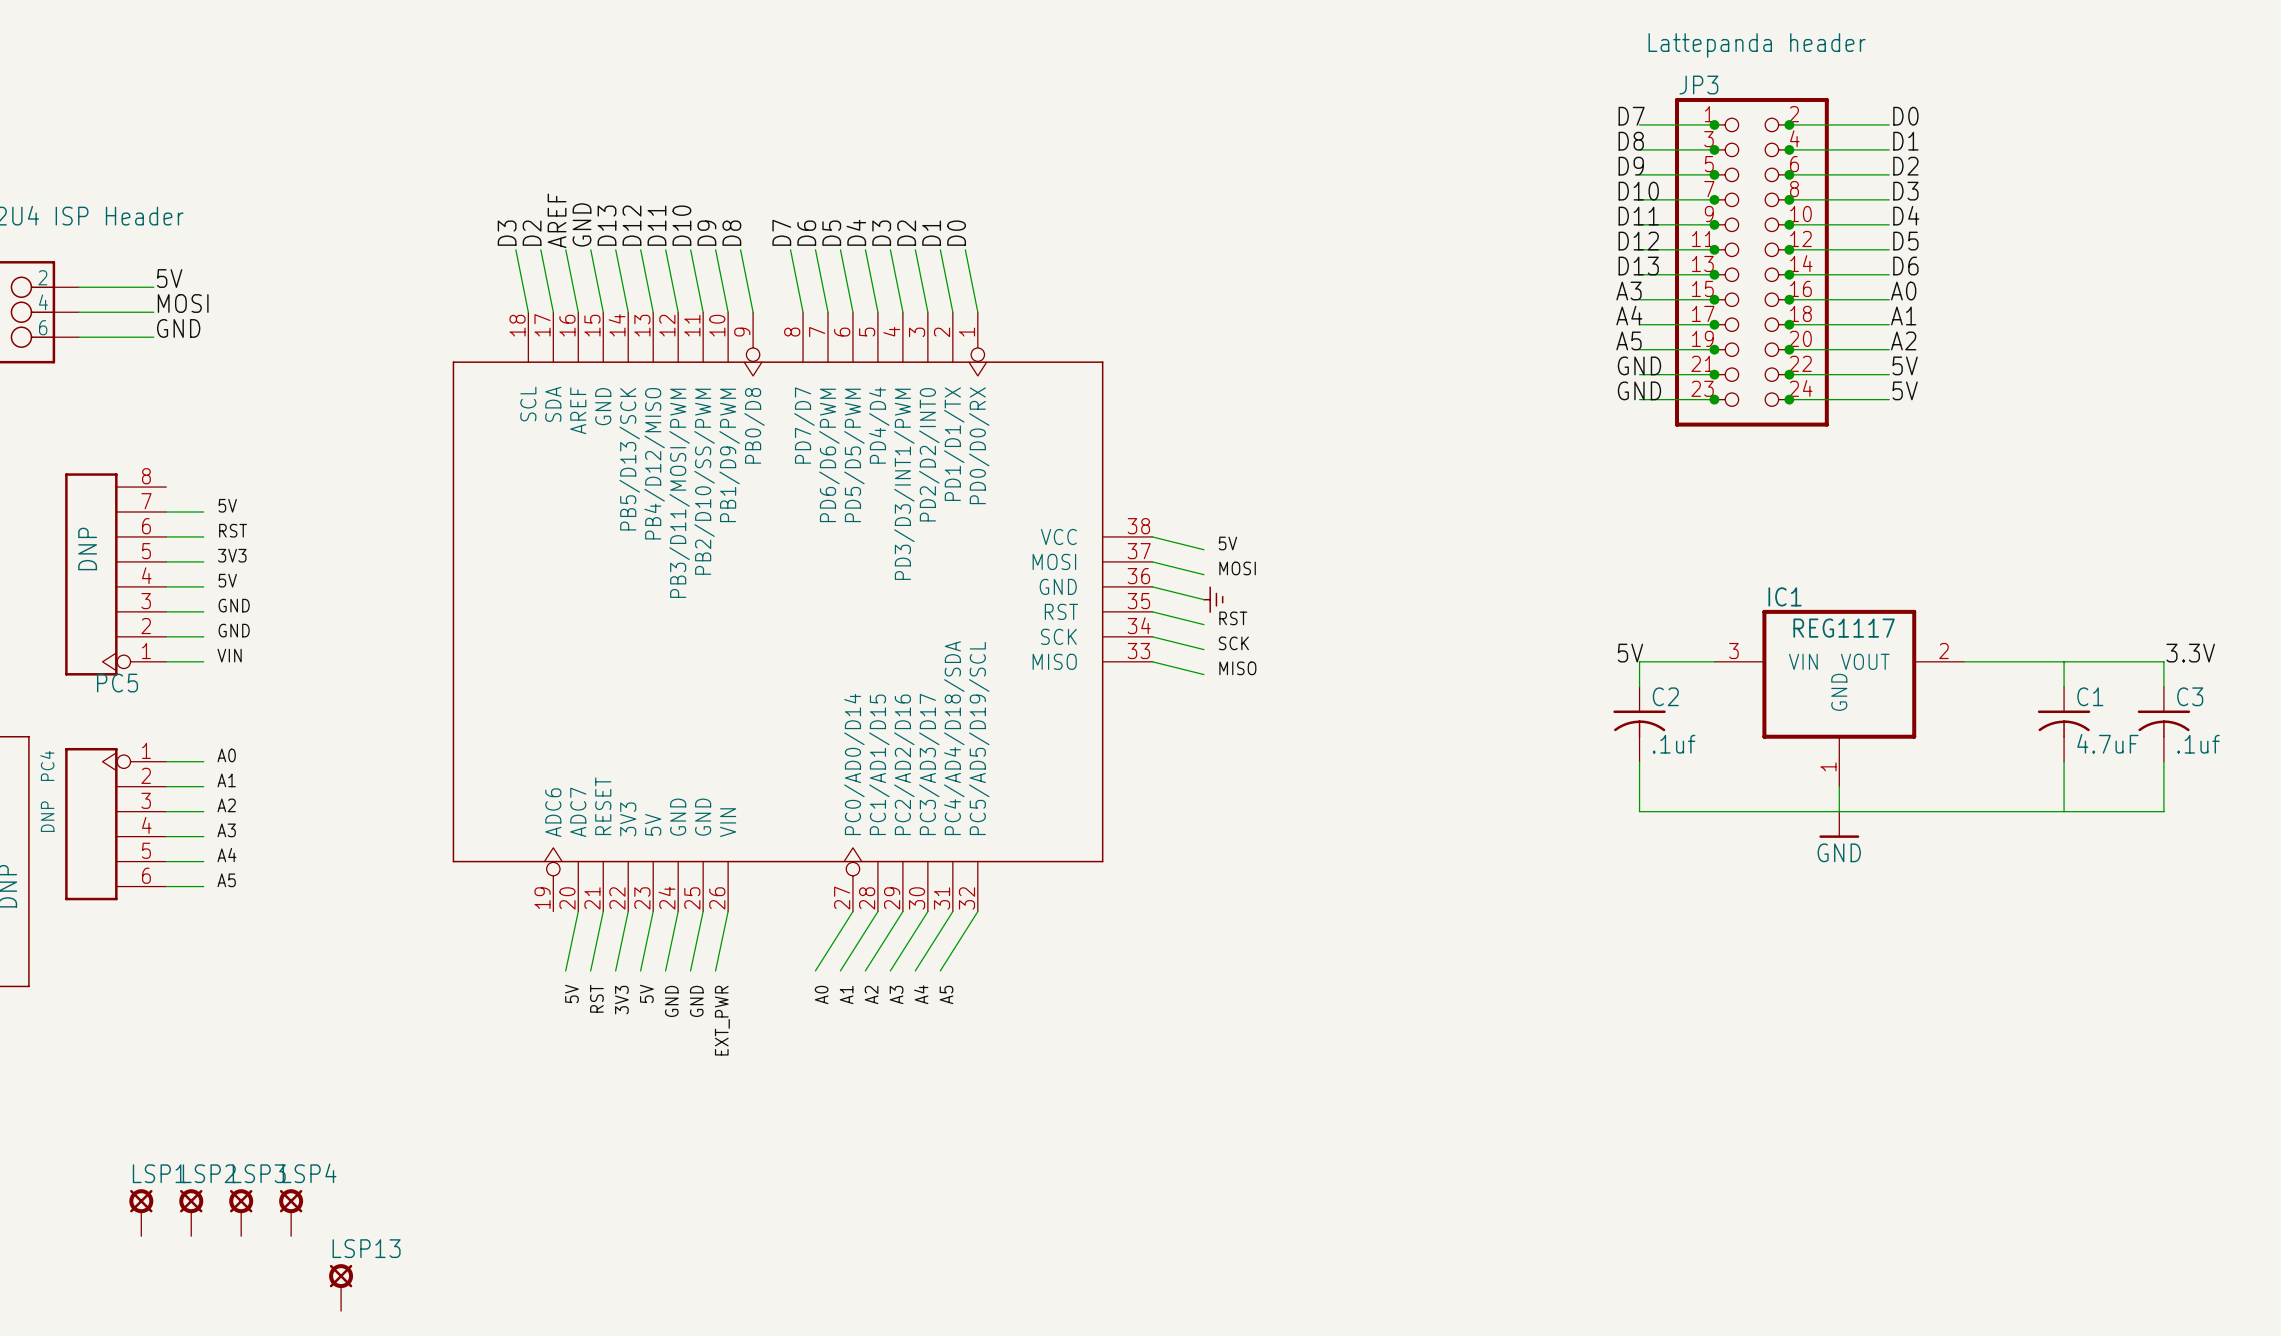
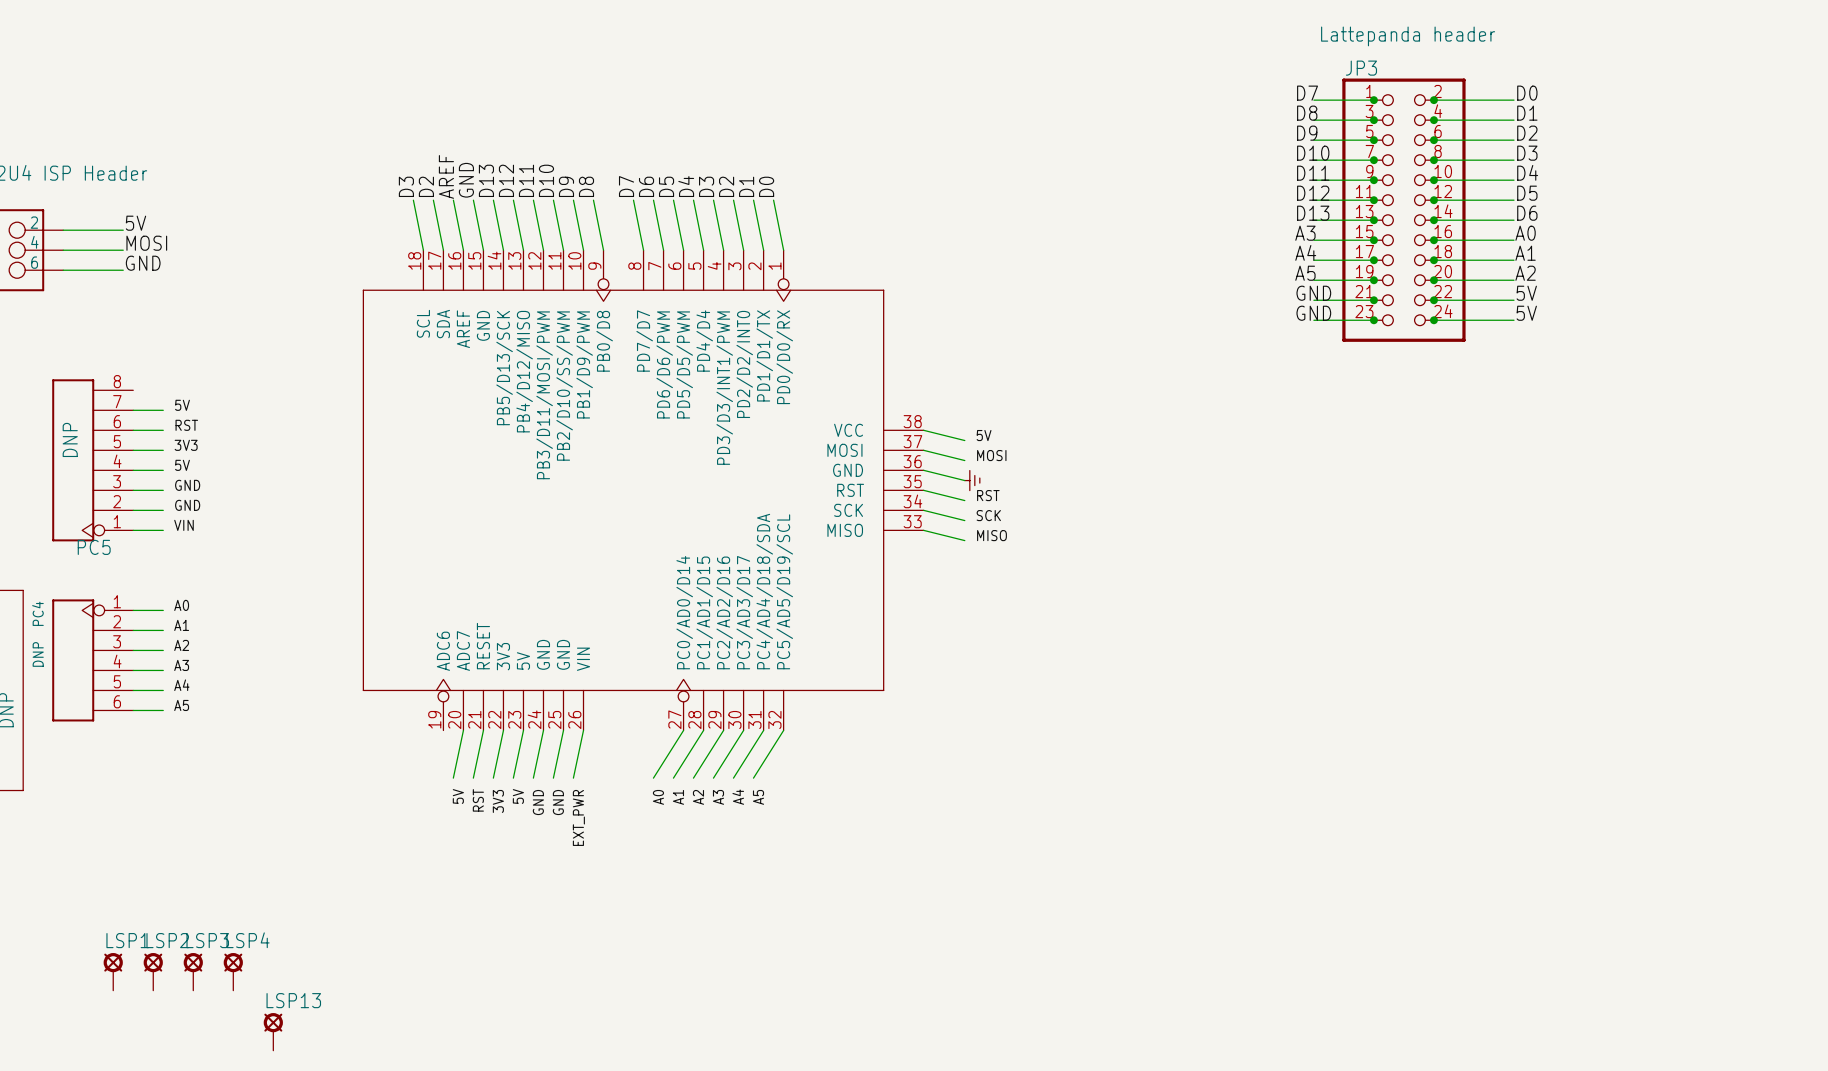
label: 5V (1630, 653) -> none
label: 3.3V (2190, 653) -> none
wire: (1714, 661) (1639, 661) (1639, 686) -> none
wire: (1964, 661) (2163, 661) (2163, 686) -> none
wire: (2064, 661) (2064, 686) -> none
IC1: REG1117 (1839, 698) -> none
C2: .1uf (1639, 724) -> none
C1: 4.7uF (2064, 724) -> none
C3: .1uf (2163, 724) -> none
wire: (1639, 761) (1639, 811) (2163, 811) (2163, 761) -> none
wire: (2064, 761) (2064, 811) -> none
wire: (1839, 786) (1839, 811) -> none
power symbol: GND (1839, 824) -> none

